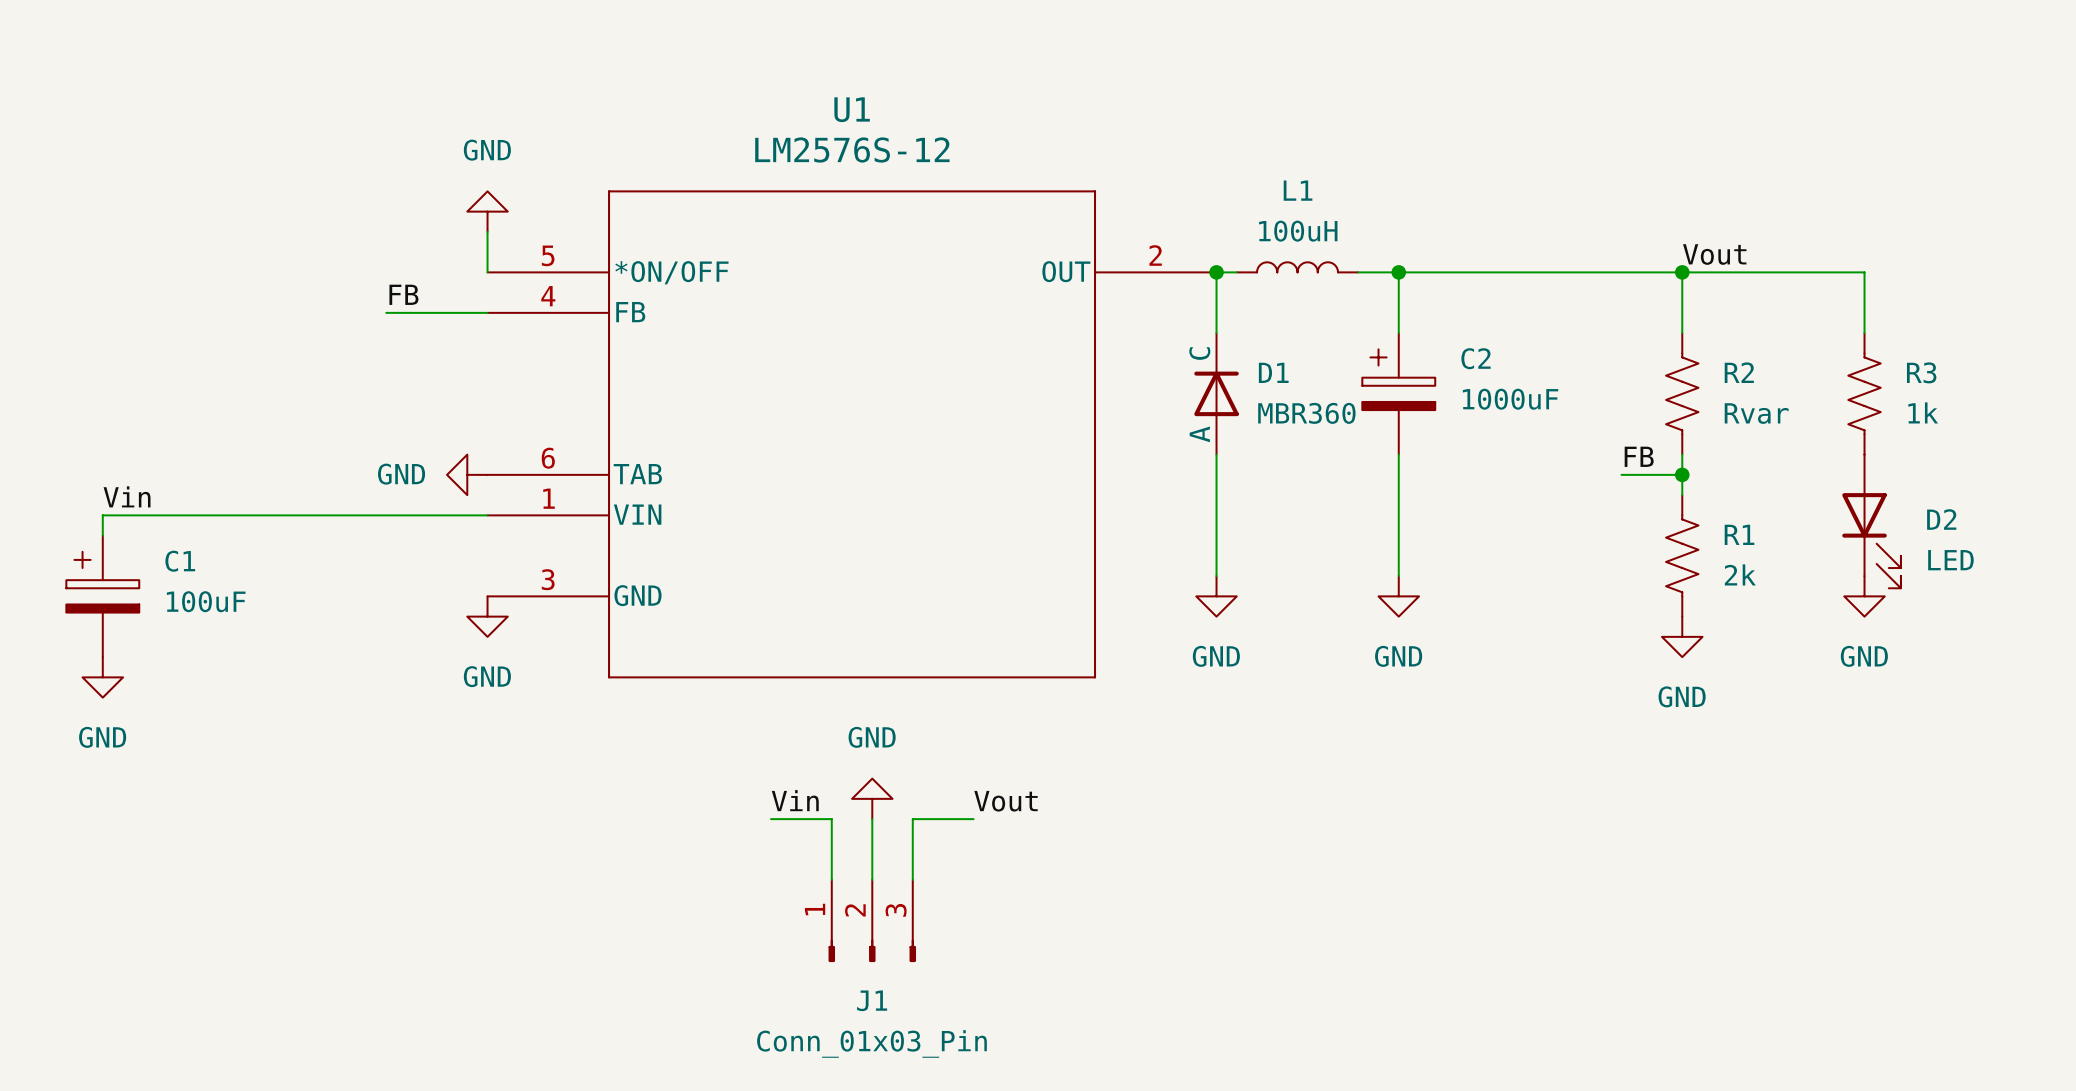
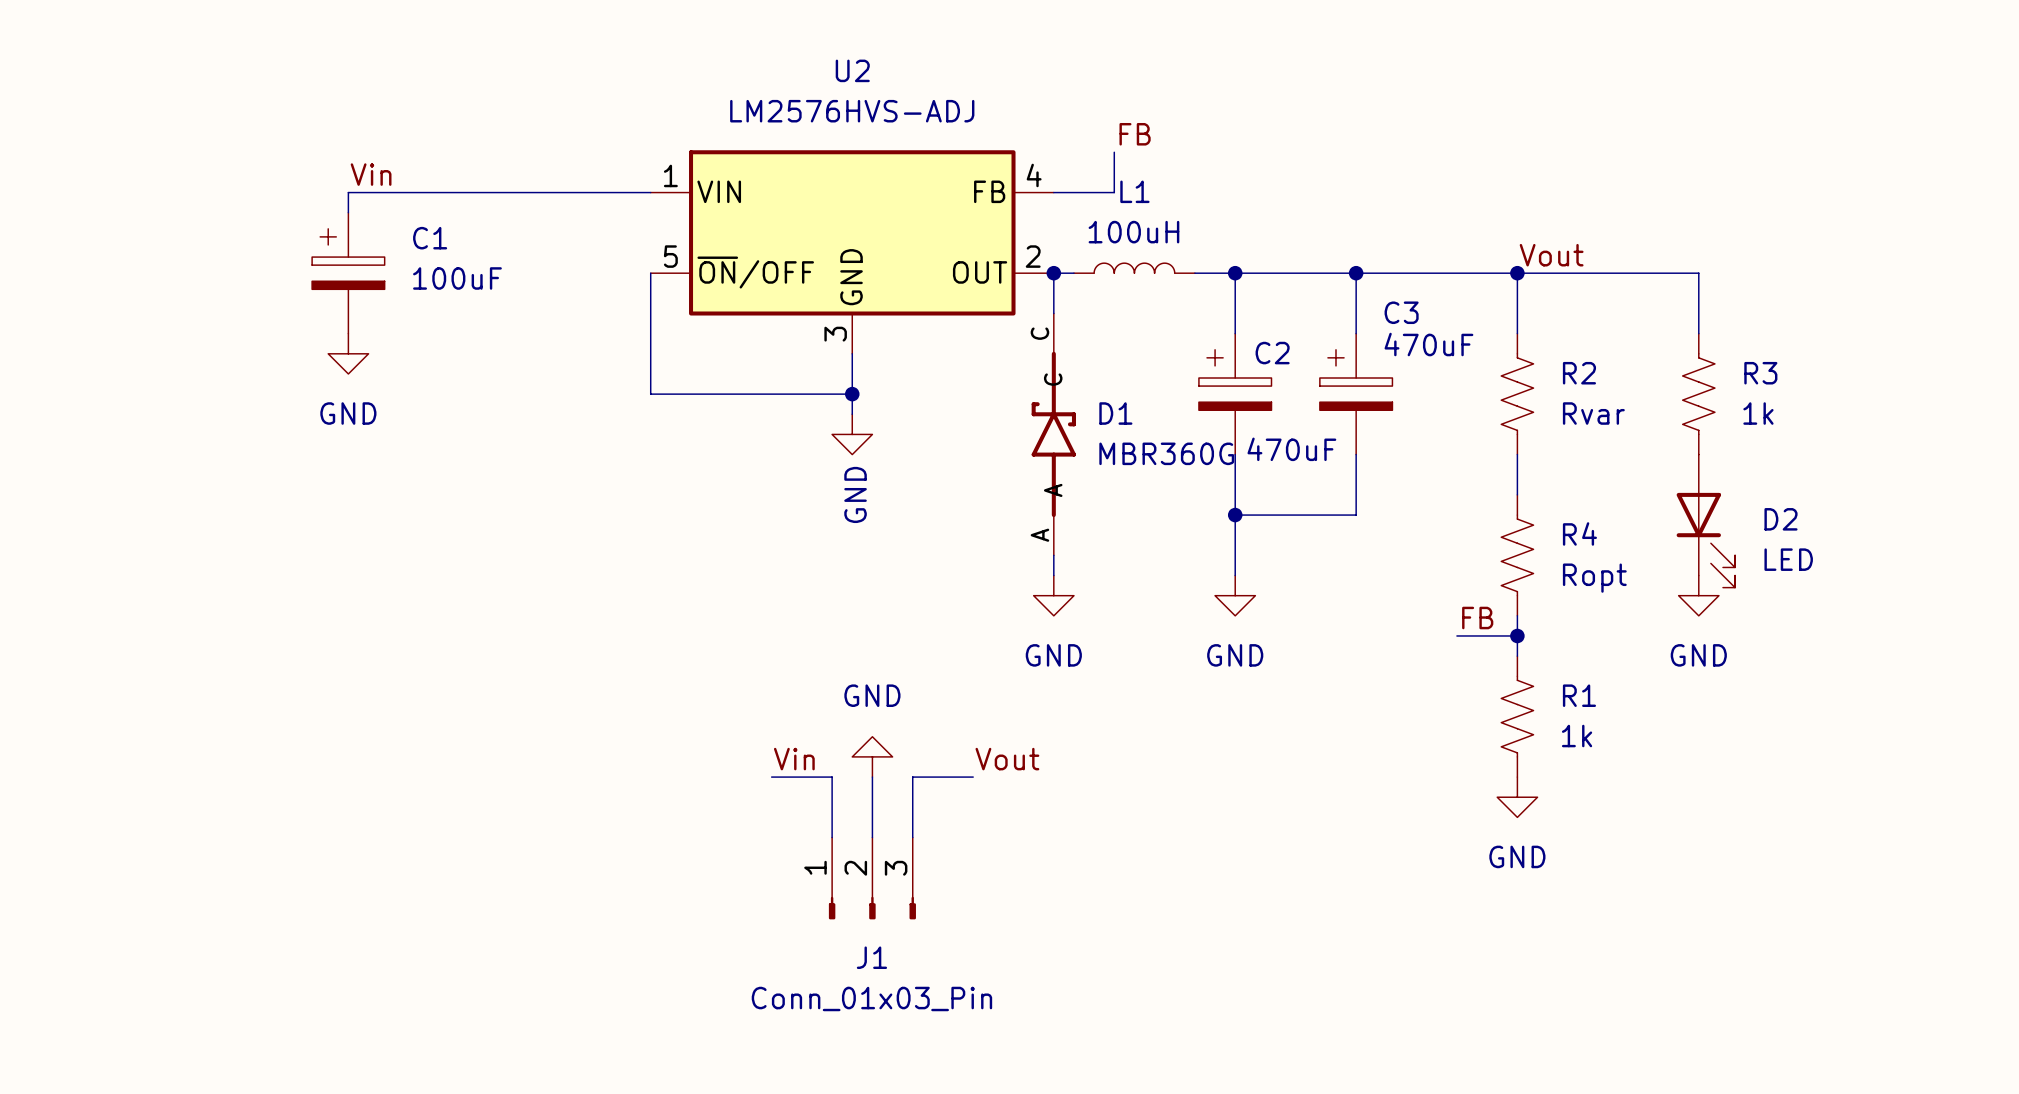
label: none -> FB (1135, 134)
wire: none -> (1114, 152) (1114, 192) (1053, 192)
power symbol: GND (487, 211) -> none
wire: (487, 231) (487, 272) -> none
wire: none -> (650, 192) (348, 192) (348, 212)
label position: Vout (1714, 254) -> Vout (1551, 255)
L1 position: (1297, 267) -> (1134, 268)
junction position: (1216, 272) -> (1235, 273)
wire: (1236, 272) (1216, 272) (1216, 333) -> none
wire: (1358, 272) (1864, 272) (1864, 333) -> (1194, 273) (1698, 273) (1698, 333)
wire: (1398, 272) (1398, 333) -> (1235, 273) (1235, 333)
junction position: (1398, 272) -> (1356, 273)
wire: (1682, 272) (1682, 333) -> (1517, 273) (1517, 333)
junction: (1682, 272) -> none
U2: none -> LM2576HVS-ADJ (852, 252)
label: FB (403, 294) -> none
wire: (386, 312) (487, 312) -> none
wire: none -> (650, 273) (650, 394) (852, 394)
junction: none -> (1053, 273)
wire: none -> (1073, 273) (1053, 273) (1053, 313)
wire: none -> (1356, 273) (1356, 333)
junction: none -> (1517, 273)
D1 symbol: [1194, 333, 1239, 455] -> [1031, 313, 1076, 556]
C2 name position: C2 (1476, 358) -> C2 (1272, 353)
power symbol: none -> GND (348, 353)
wire: none -> (852, 353) (852, 414)
C2 position: (1398, 393) -> (1235, 394)
R2 position: (1682, 393) -> (1517, 394)
R3 position: (1864, 393) -> (1698, 394)
C2 value: 1000uF (1510, 399) -> 470uF (1291, 449)
D1 value: MBR360 (1306, 413) -> MBR360G (1166, 453)
junction: none -> (852, 394)
U1: LM2576S-12 (852, 434) -> none
C3: none -> 470uF (1356, 394)
wire: (1216, 454) (1216, 576) -> none
wire: (1398, 454) (1398, 576) -> (1235, 454) (1235, 575)
wire: (1682, 454) (1682, 495) -> (1517, 454) (1517, 494)
label position: FB (1639, 456) -> FB (1477, 618)
power symbol: GND (467, 474) -> none
power symbol: none -> GND (852, 434)
wire: (1621, 474) (1682, 474) -> (1456, 635) (1517, 635)
junction: (1682, 474) -> none
wire: none -> (1356, 454) (1356, 515) (1235, 515)
label position: Vin (127, 496) -> Vin (371, 174)
wire: (487, 515) (102, 515) (102, 535) -> none
D2 position: (1871, 521) -> (1705, 521)
junction: none -> (1235, 515)
R1 position: (1682, 555) -> (1517, 716)
R1 value: 2k (1740, 574) -> 1k (1577, 736)
C1 position: (102, 596) -> (348, 273)
wire: none -> (1053, 555) (1053, 575)
power symbol position: GND (1216, 596) -> GND (1235, 595)
power symbol: GND (1398, 596) -> none
R4: none -> Ropt (1517, 555)
power symbol: GND (1864, 596) -> none
power symbol: GND (487, 616) -> none
power symbol: none -> GND (1053, 595)
power symbol position: GND (1682, 636) -> GND (1698, 595)
wire: none -> (1517, 615) (1517, 656)
power symbol: GND (102, 677) -> none
junction: none -> (1517, 635)
power symbol: none -> GND (1517, 797)

